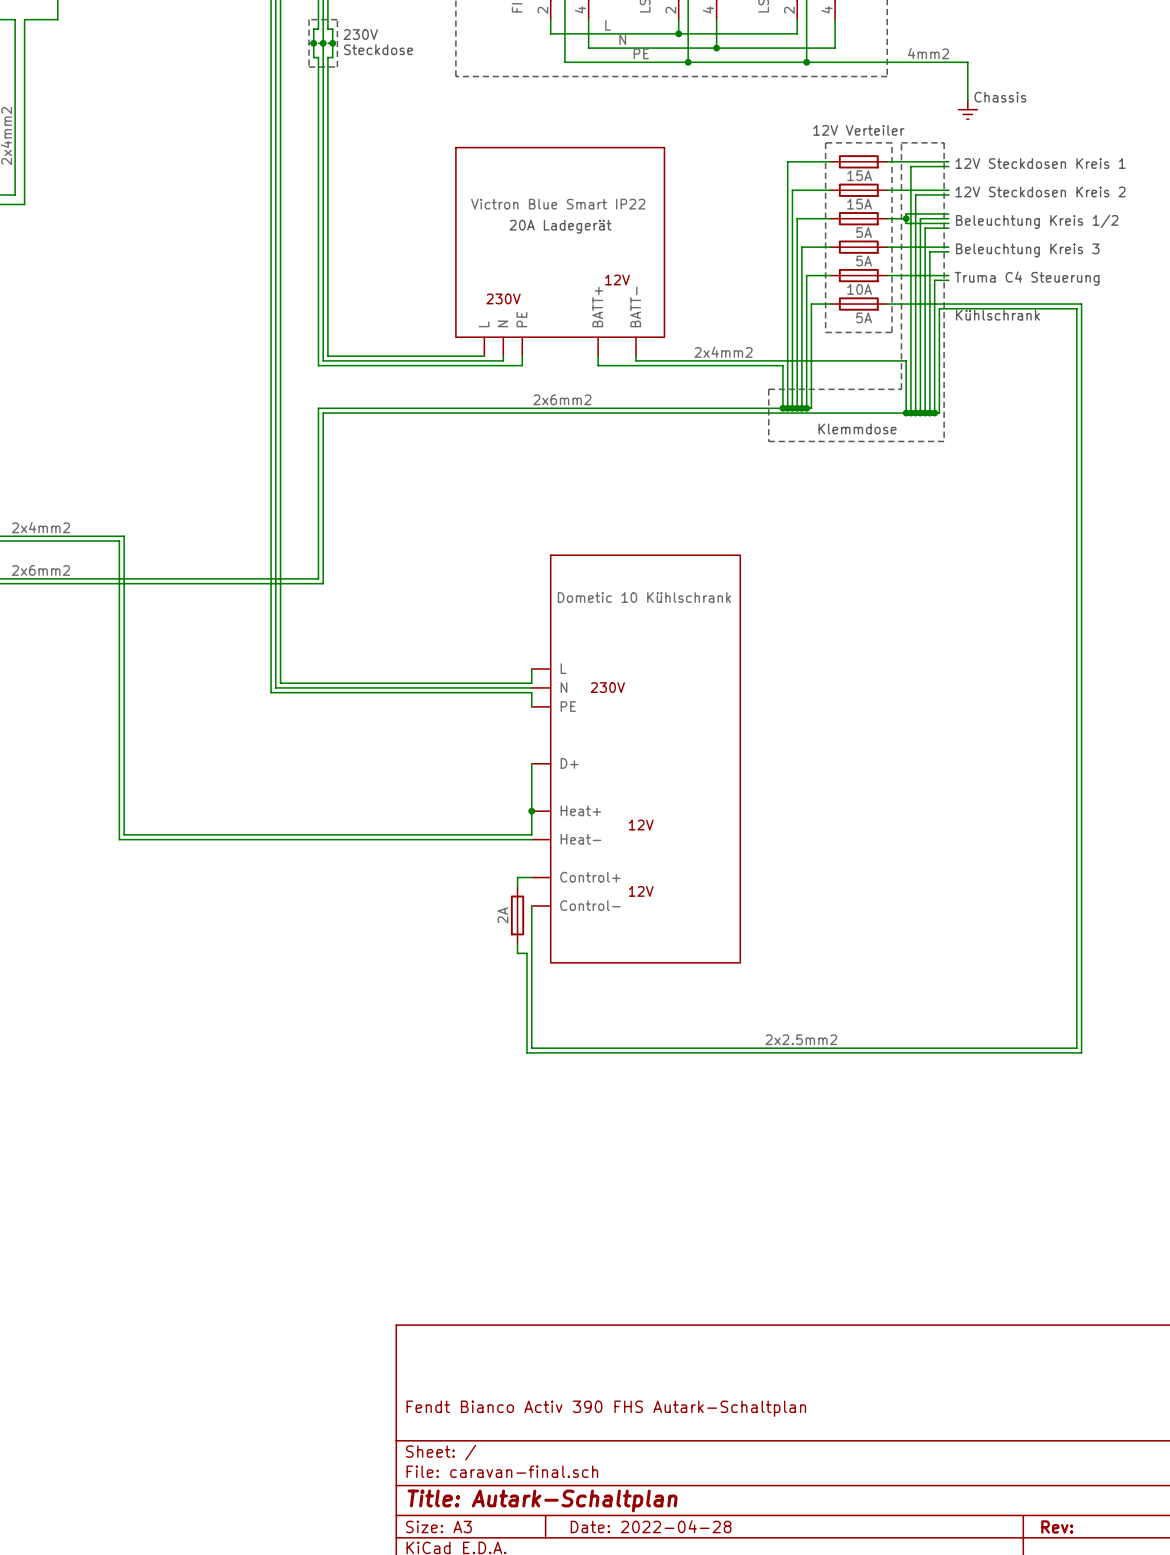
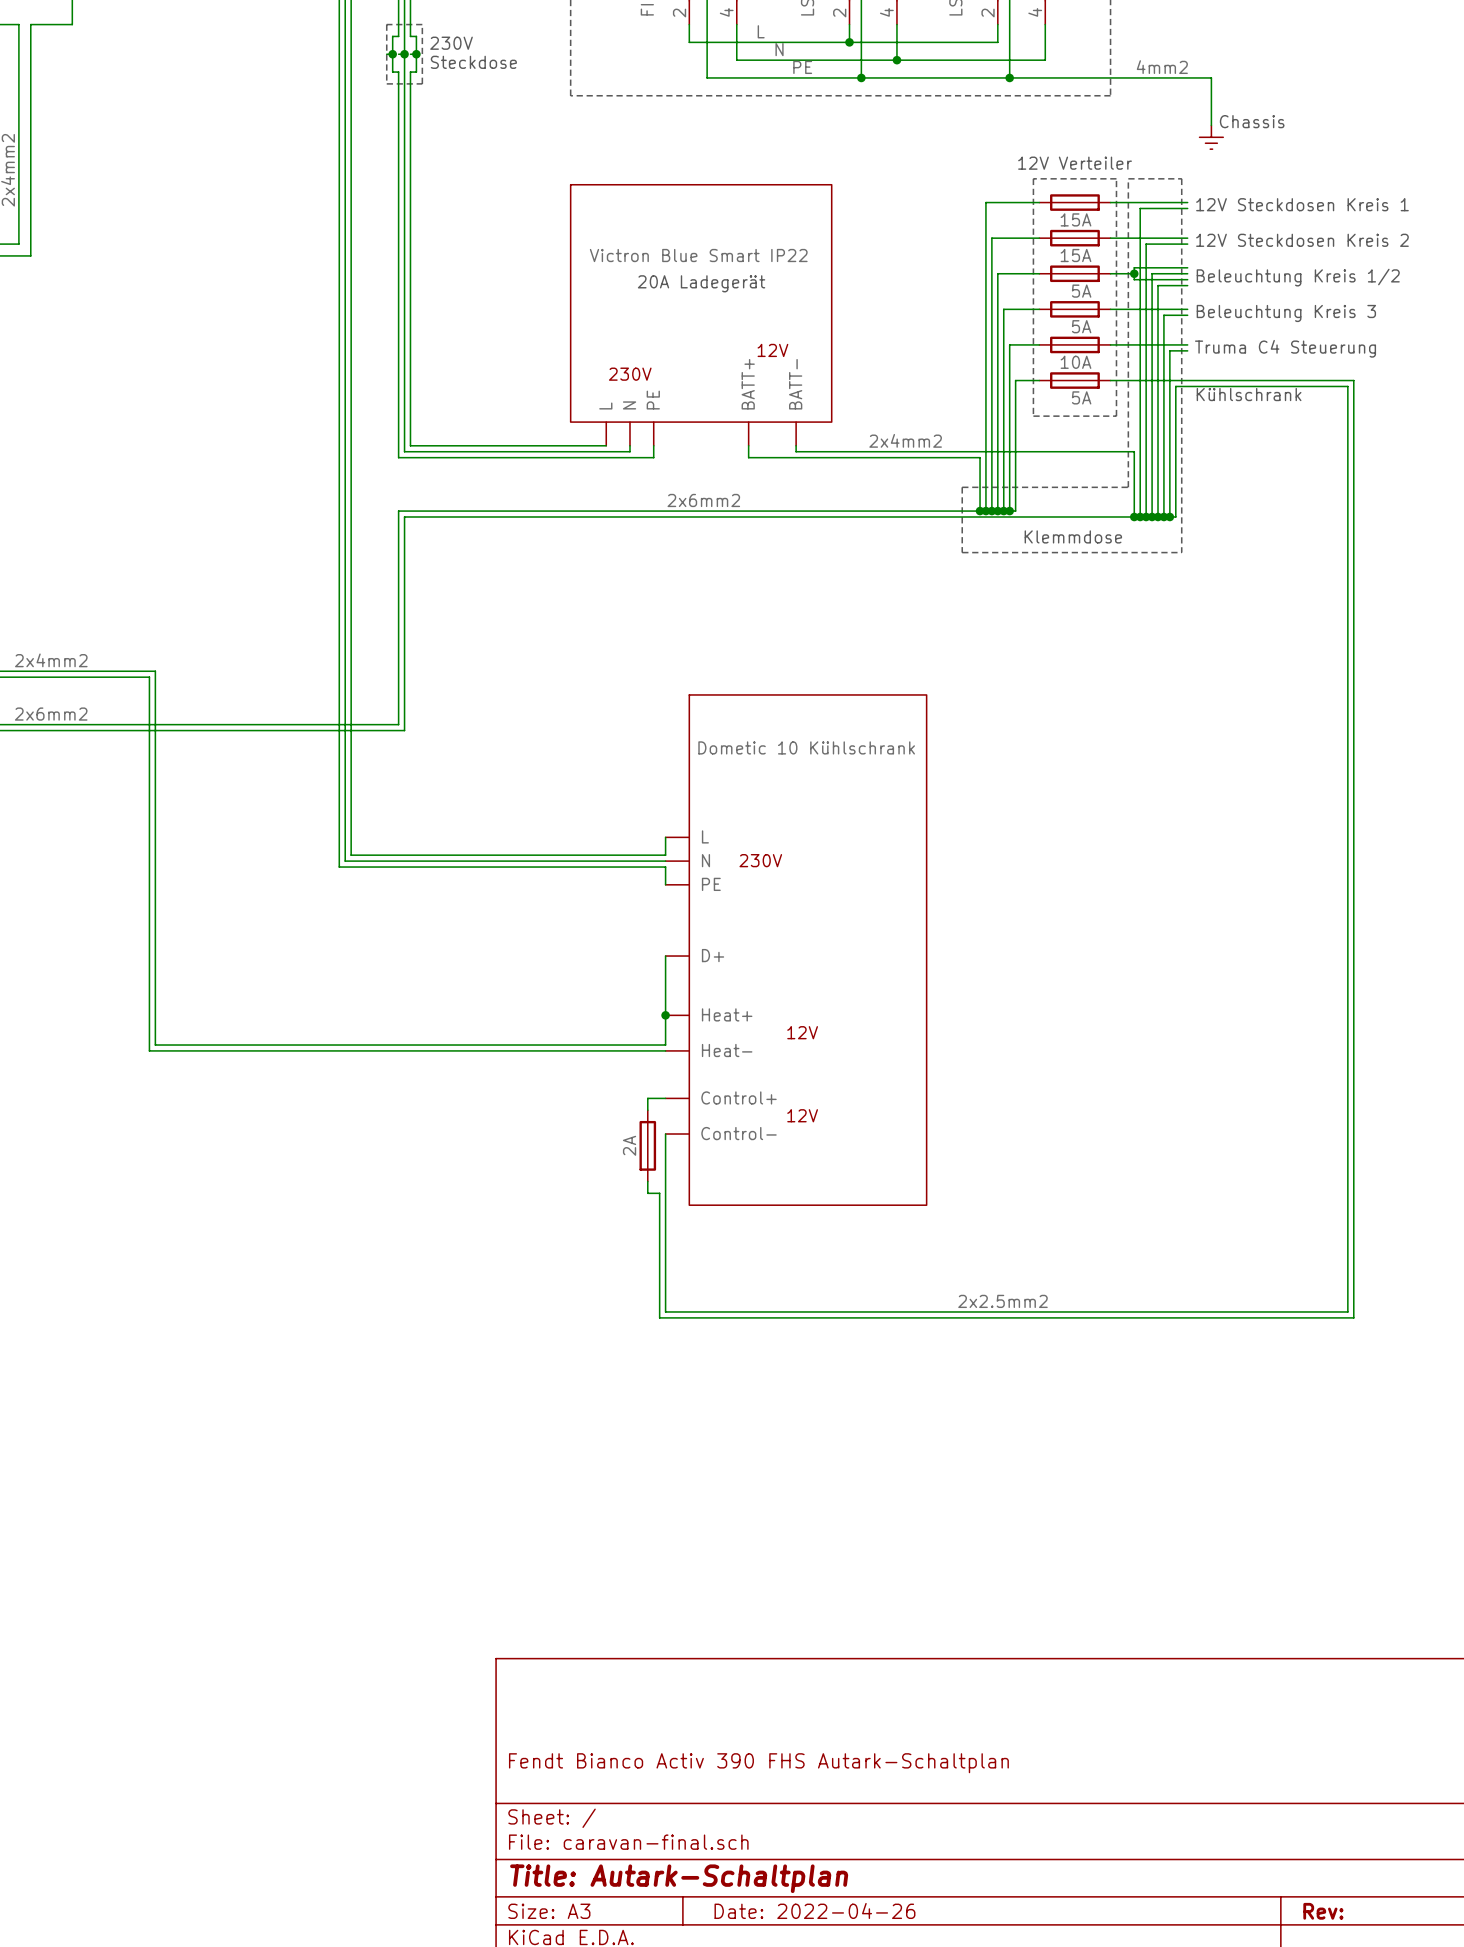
title block: Date: 2022-04-28 (651, 1526) -> Date: 2022-04-26 (814, 1910)

